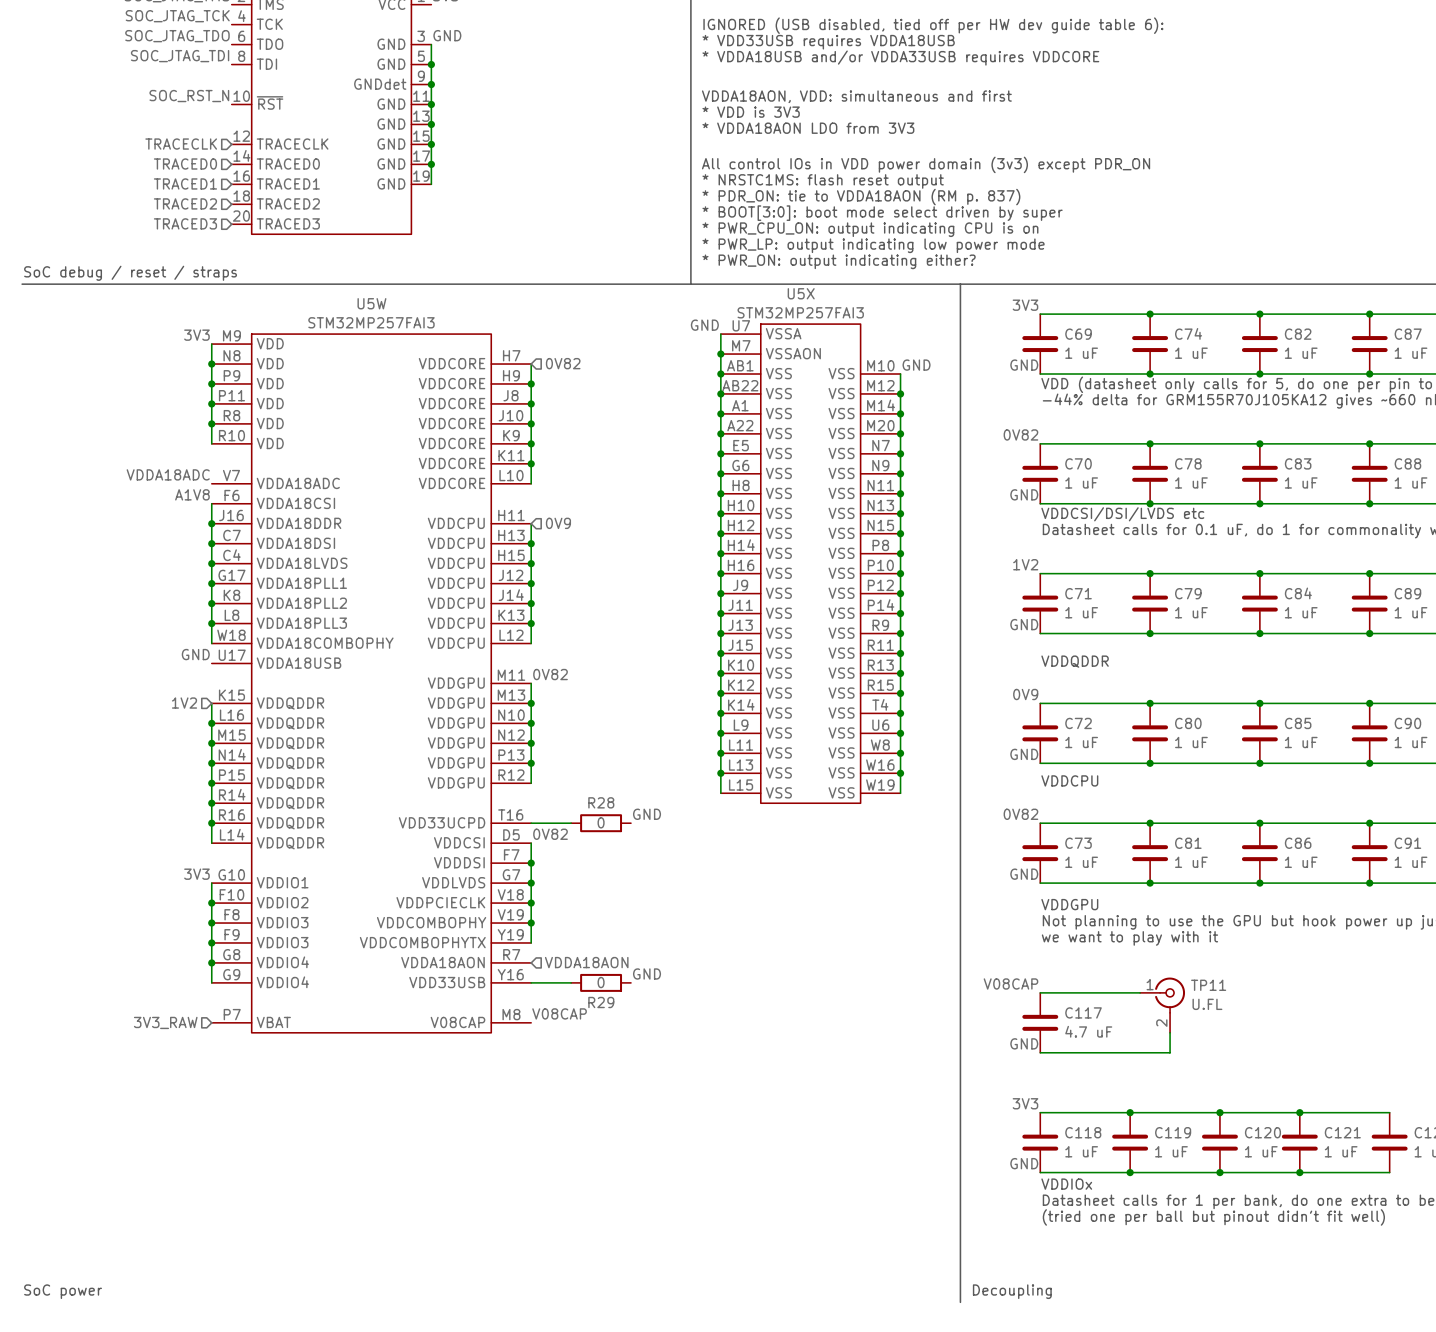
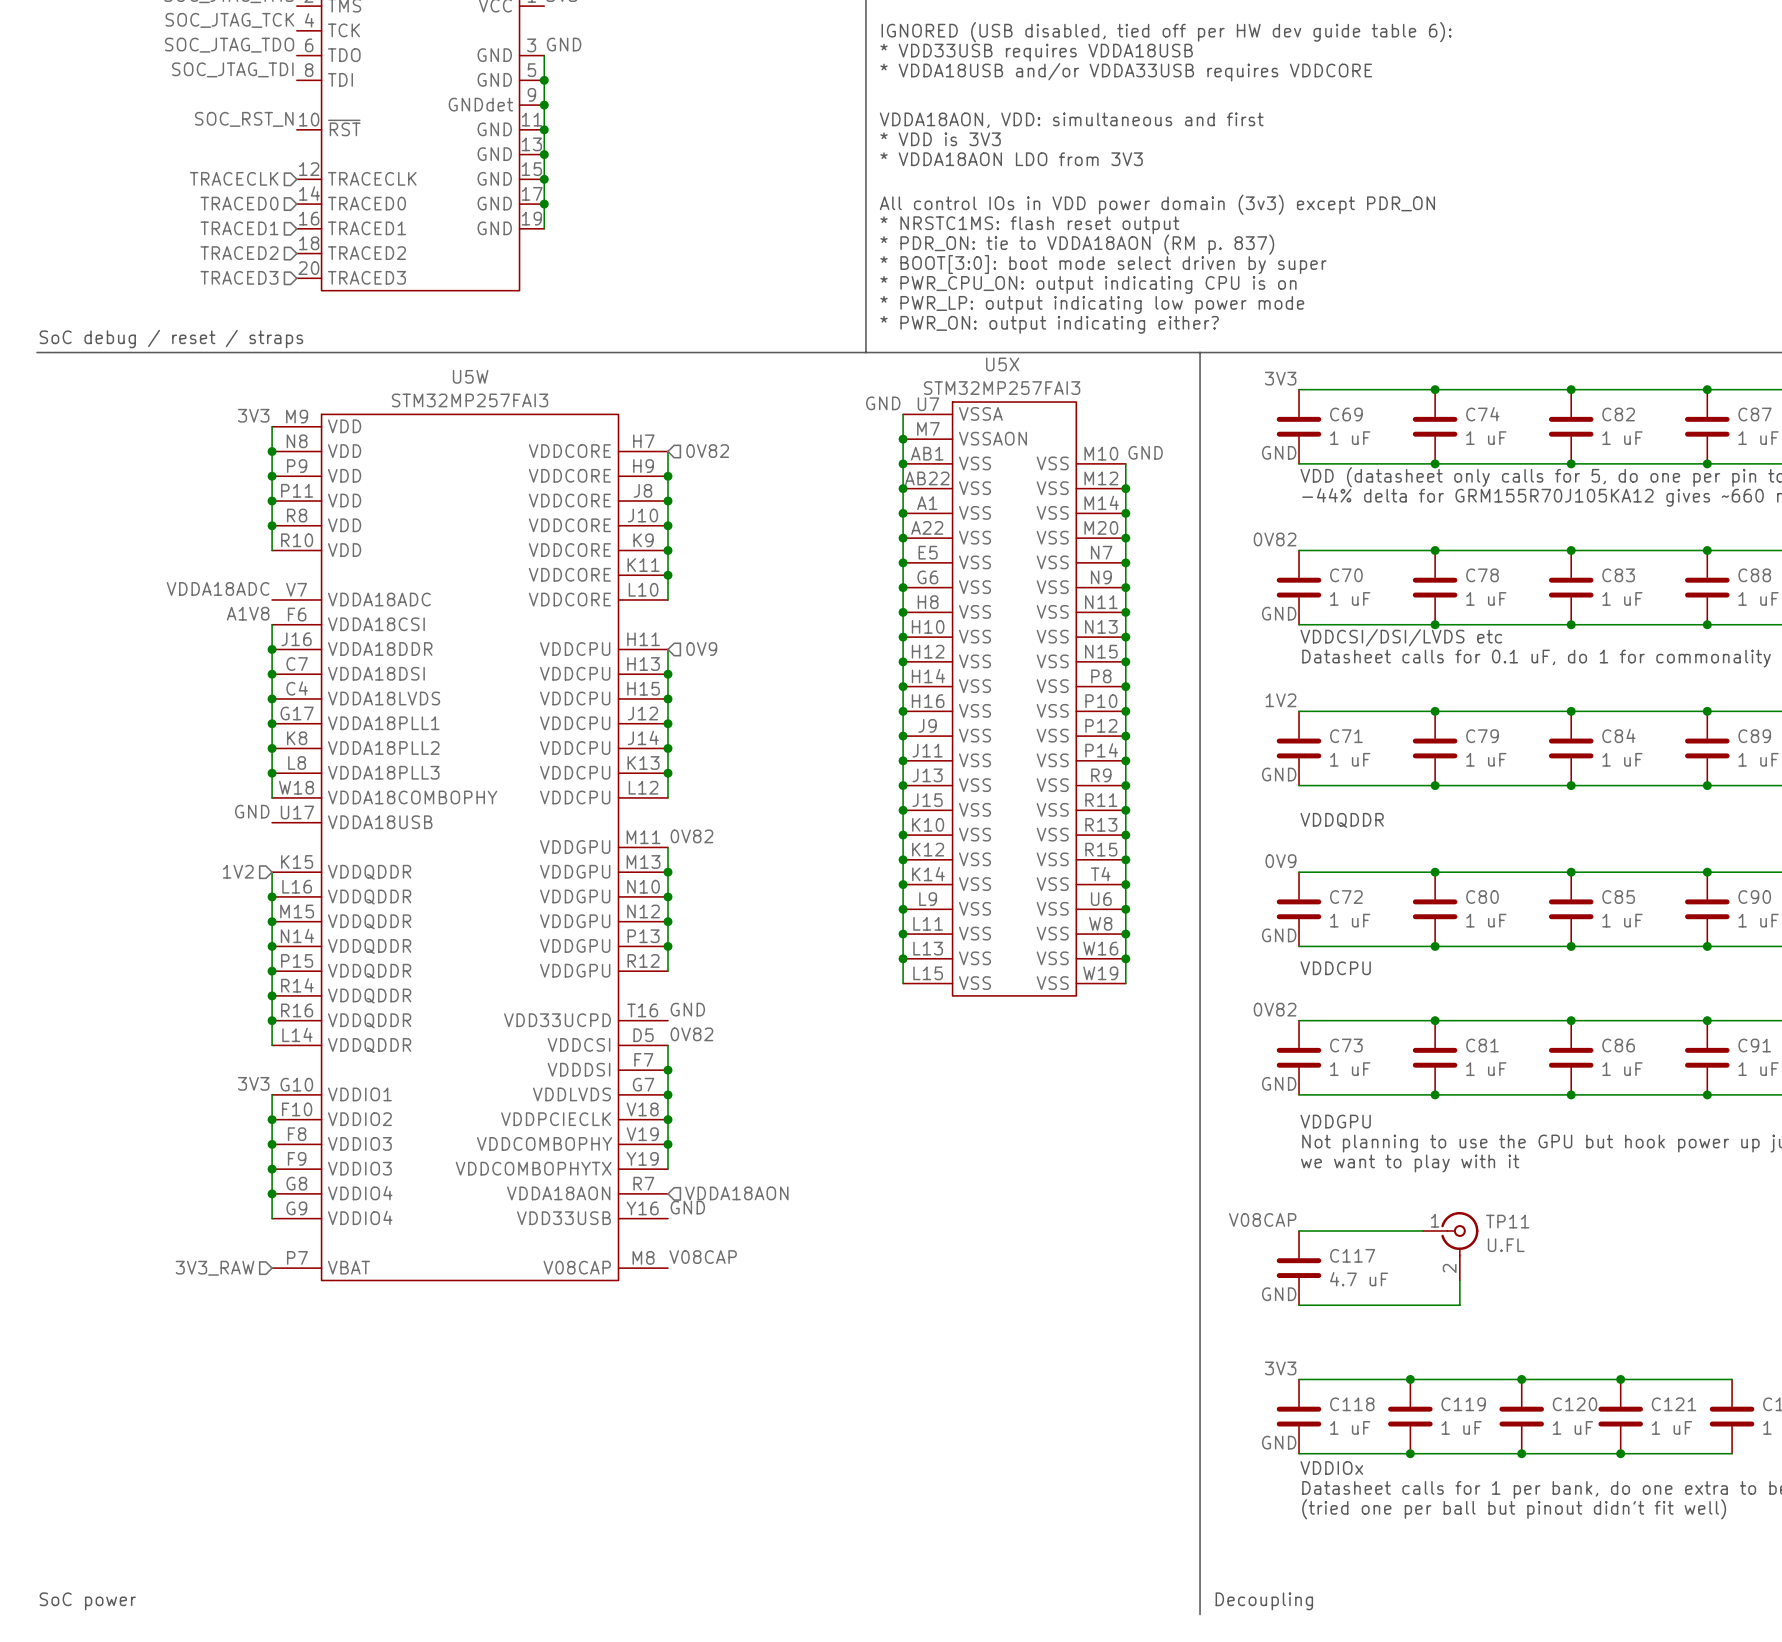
label: none -> GND (687, 1009)
label: GND (647, 814) -> none
wire: (531, 823) (571, 823) -> none
R28: 0 (601, 823) -> none
label: none -> GND (687, 1207)
label: GND (647, 974) -> none
wire: (531, 982) (571, 982) -> none
R29: 0 (601, 982) -> none

